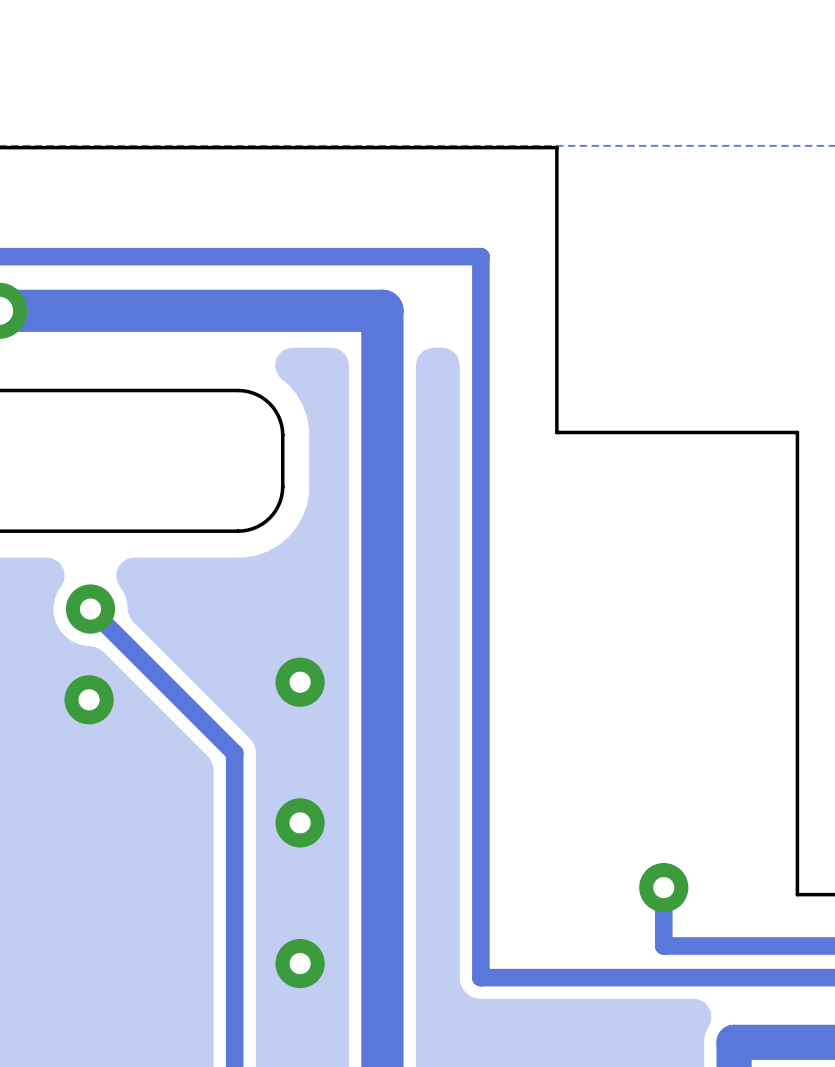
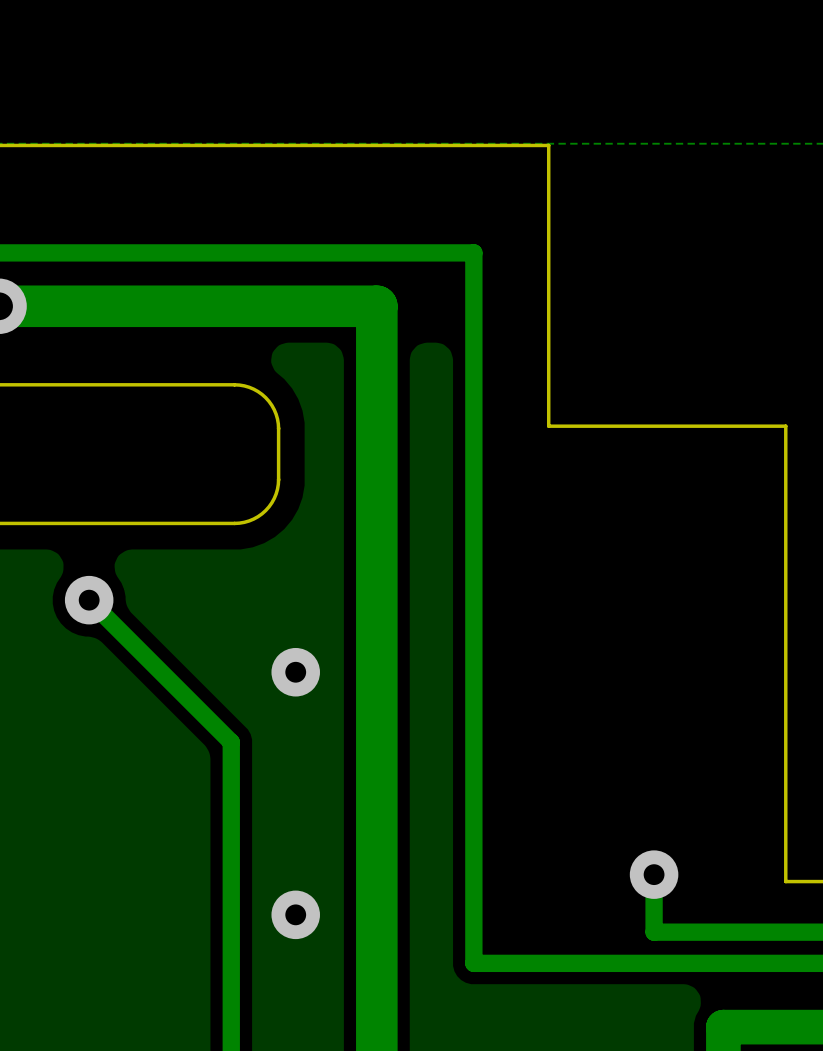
via: (89, 699) -> none
via: (300, 822) -> none
via position: (300, 963) -> (295, 914)

